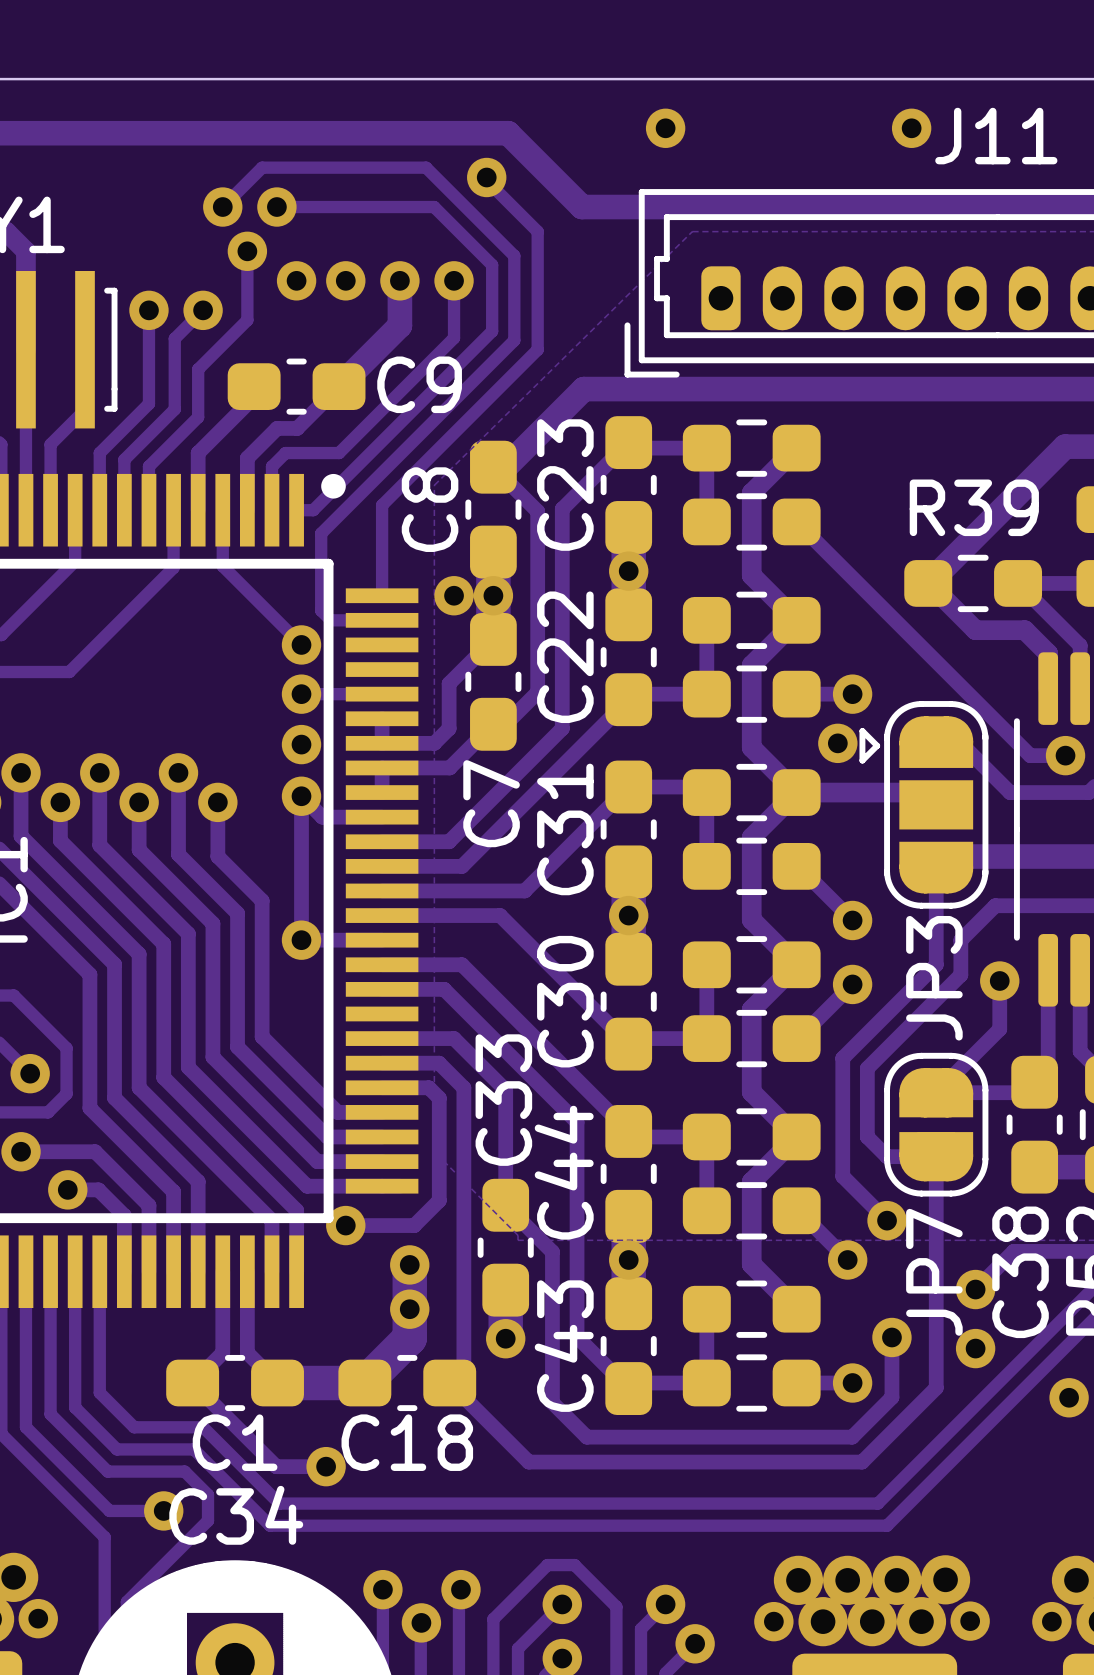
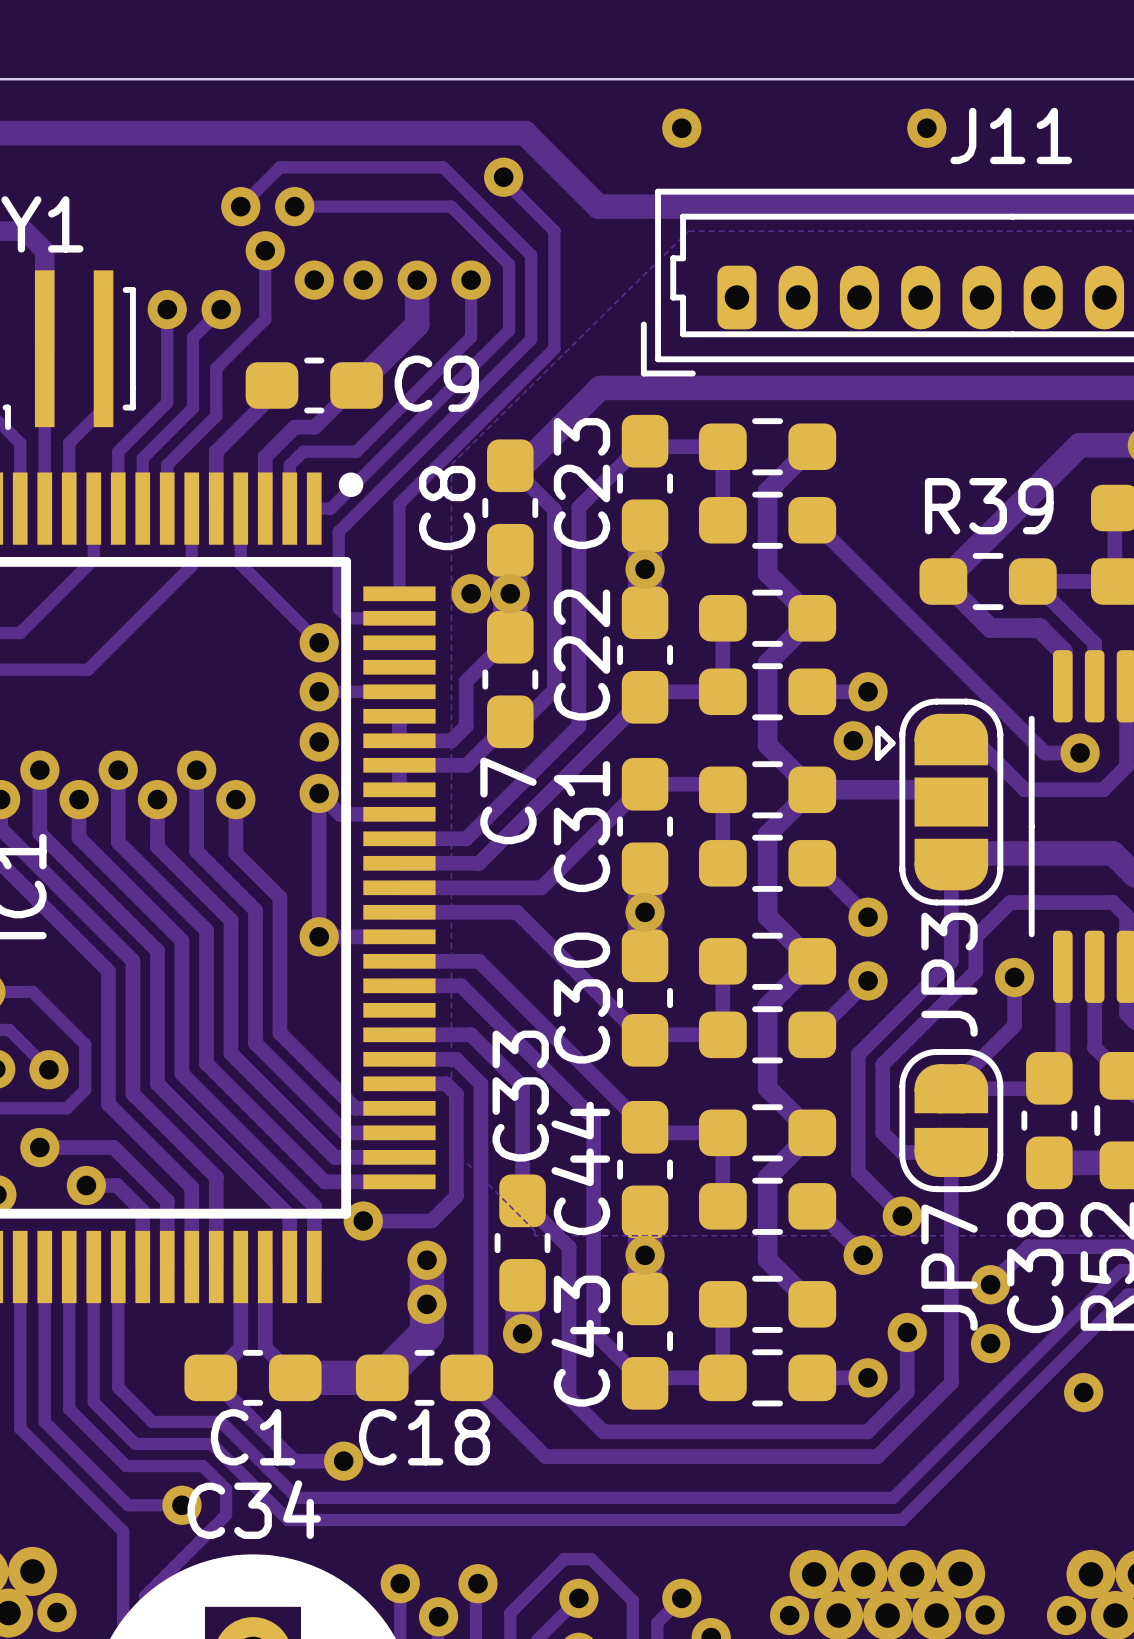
zone outline: (692, 231) (434, 485) -> (708, 231) (688, 231) (451, 464) (451, 483)

